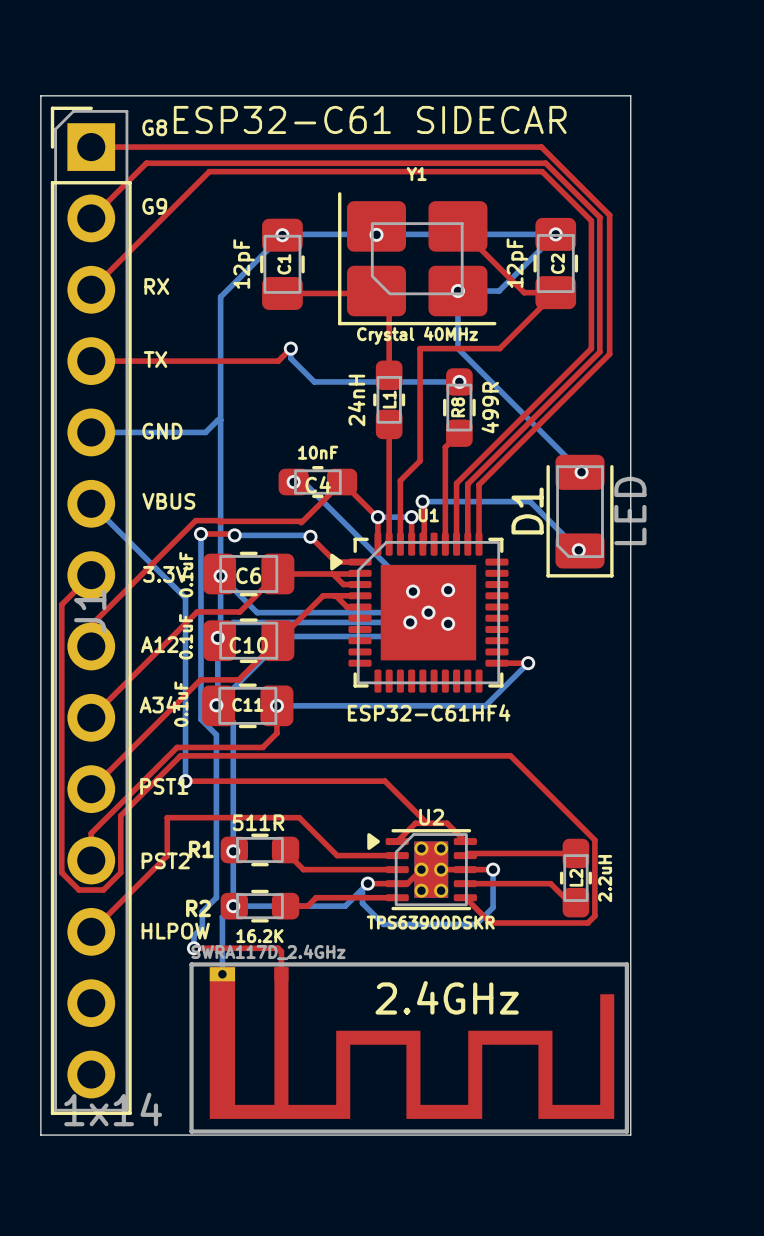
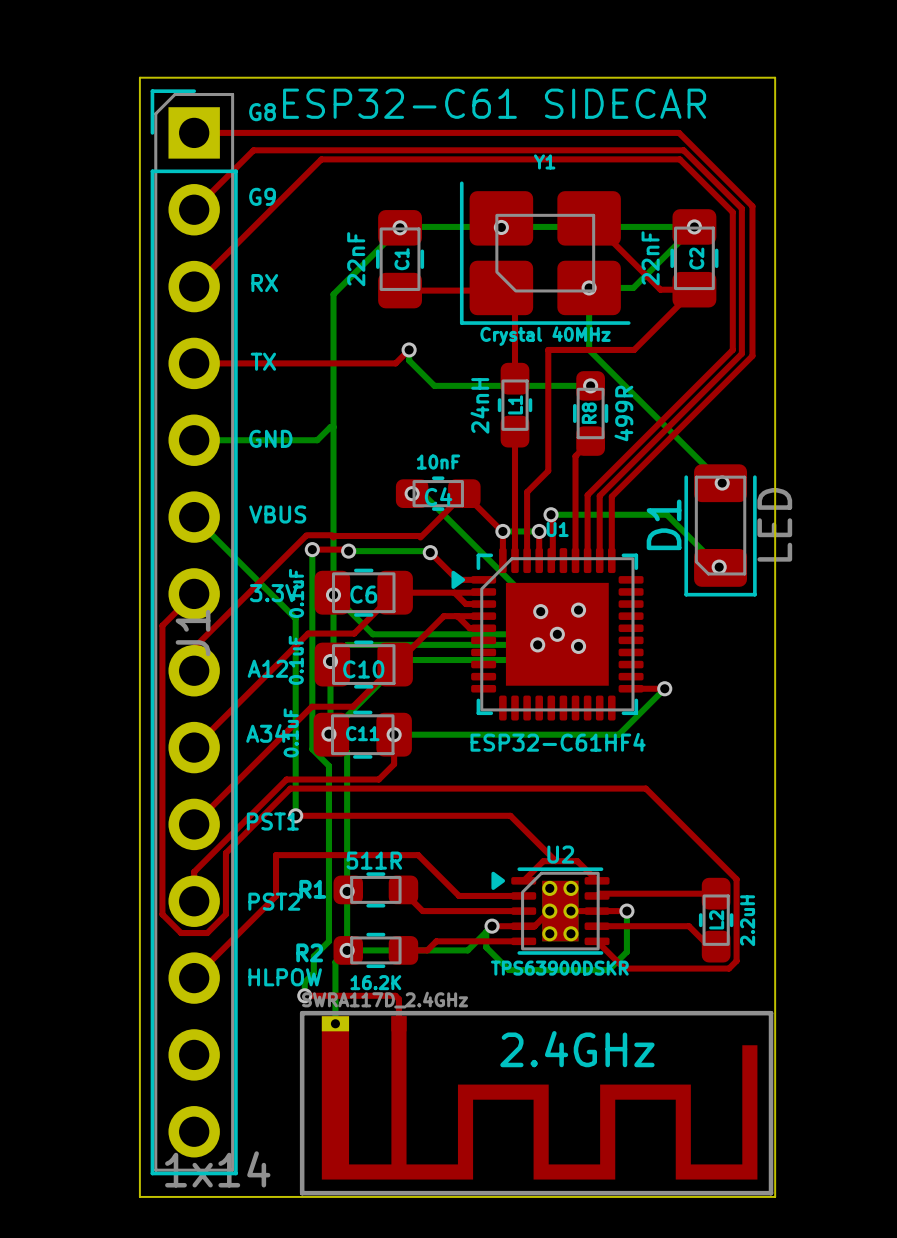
C2 value: 12pF (517, 263) -> 22nF (650, 258)
C1 value: 12pF (244, 264) -> 22nF (356, 259)

